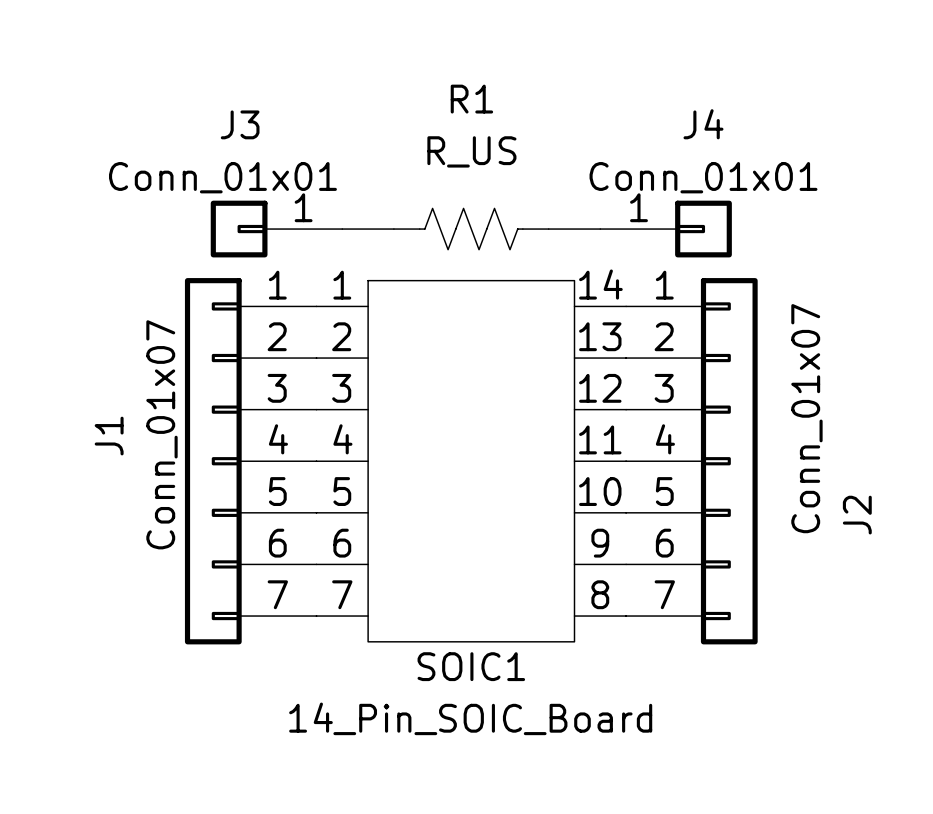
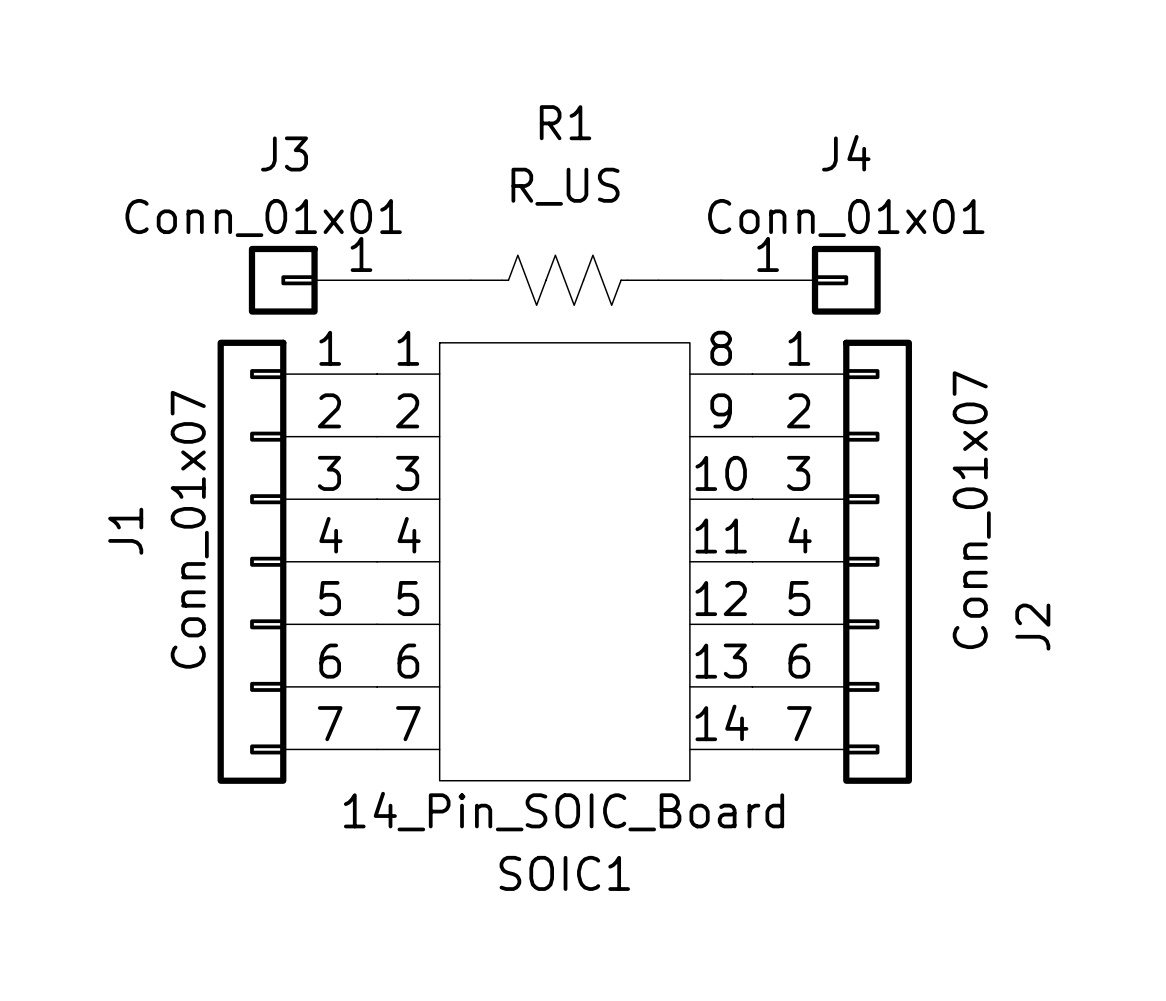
SOIC1 pin number: 14 (600, 284) -> 8 (721, 348)
SOIC1 pin number: 13 (600, 336) -> 9 (721, 410)
SOIC1 pin number: 12 (600, 388) -> 10 (721, 473)
SOIC1 pin number: 10 (600, 491) -> 12 (721, 598)
SOIC1 pin number: 9 (600, 543) -> 13 (721, 661)
SOIC1 pin number: 8 (600, 594) -> 14 (721, 722)
SOIC1 name position: SOIC1 (471, 666) -> SOIC1 (564, 873)
SOIC1 value position: 14_Pin_SOIC_Board (470, 718) -> 14_Pin_SOIC_Board (564, 811)

